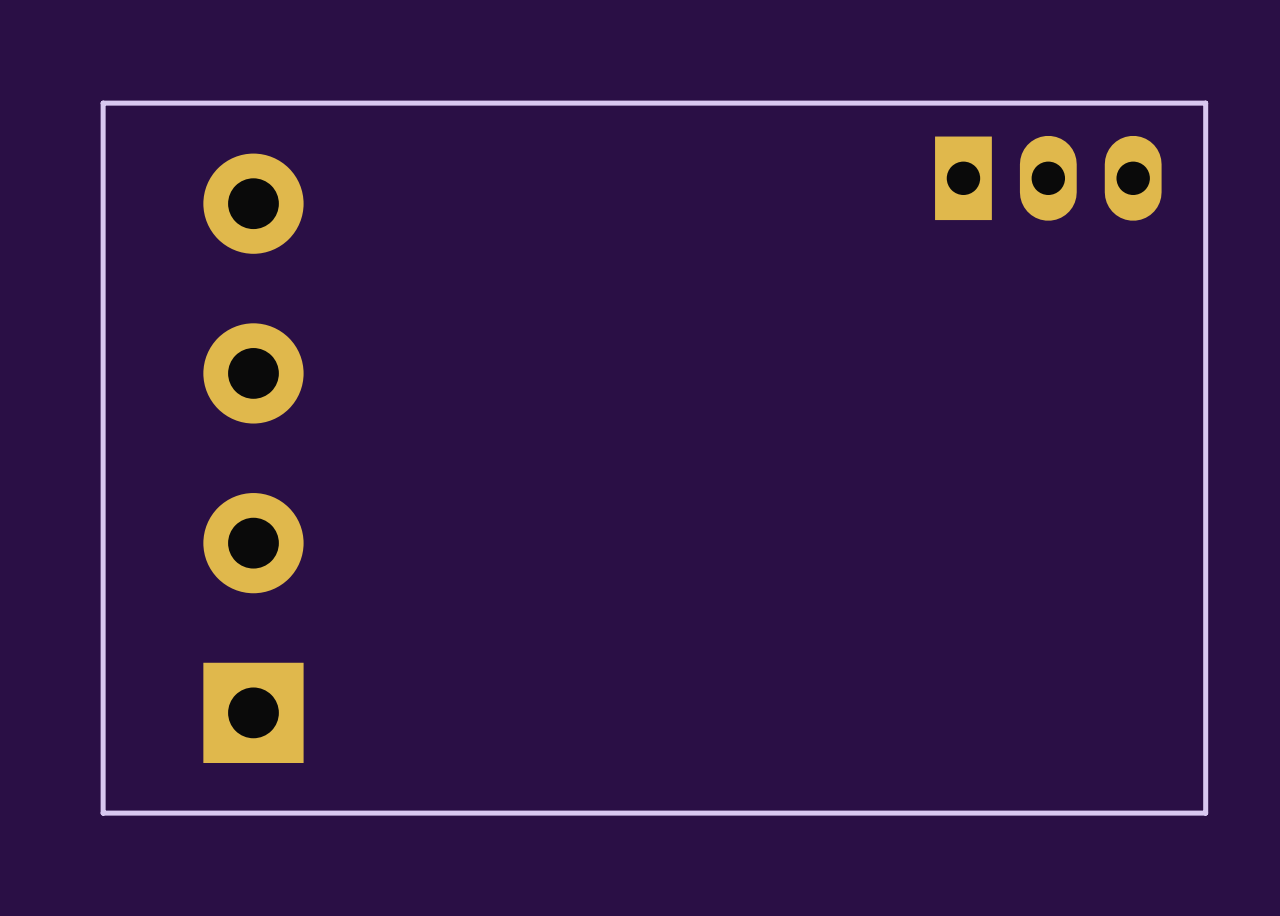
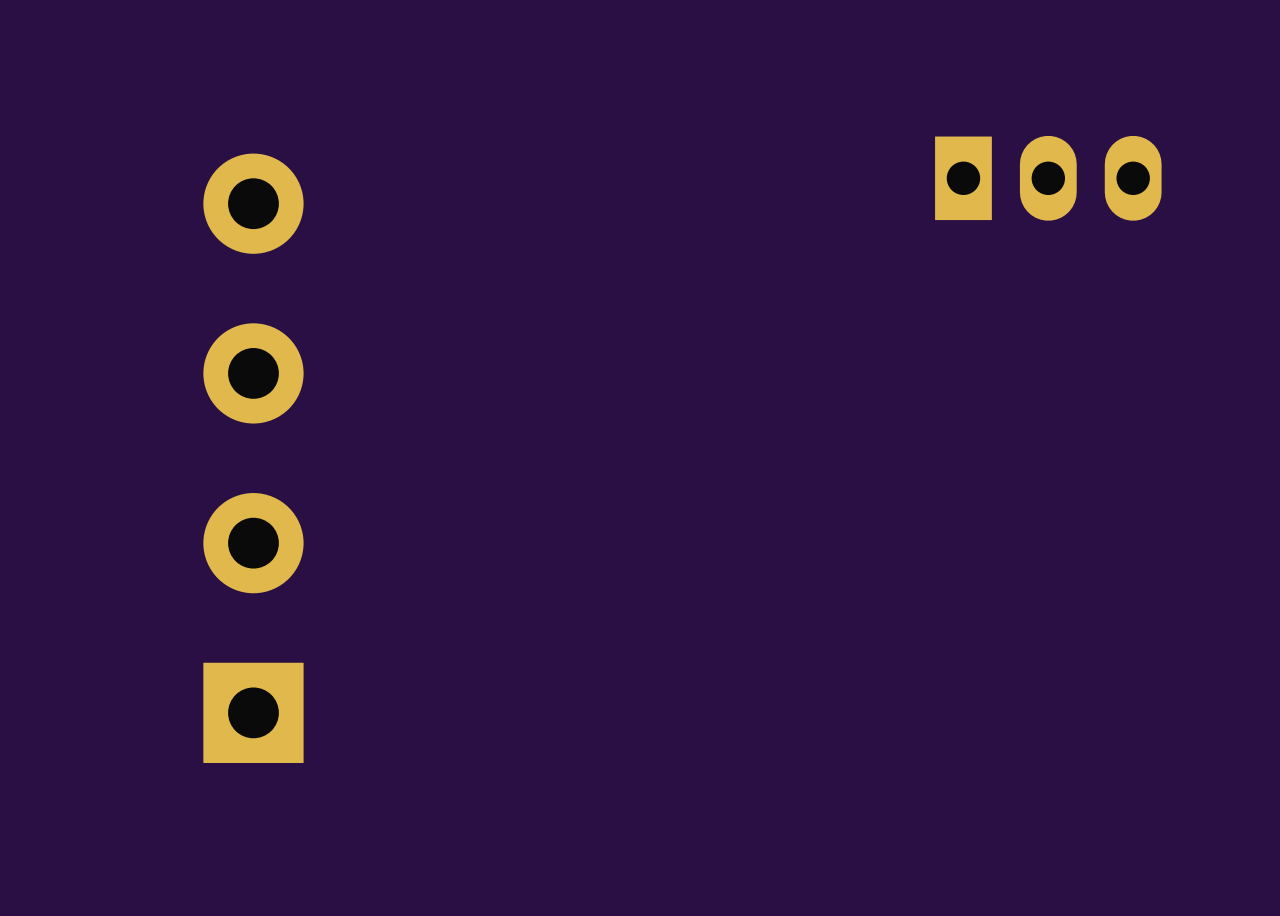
board edge: (1205, 103) (103, 103) (103, 813) (1205, 813) (1205, 103) -> none

